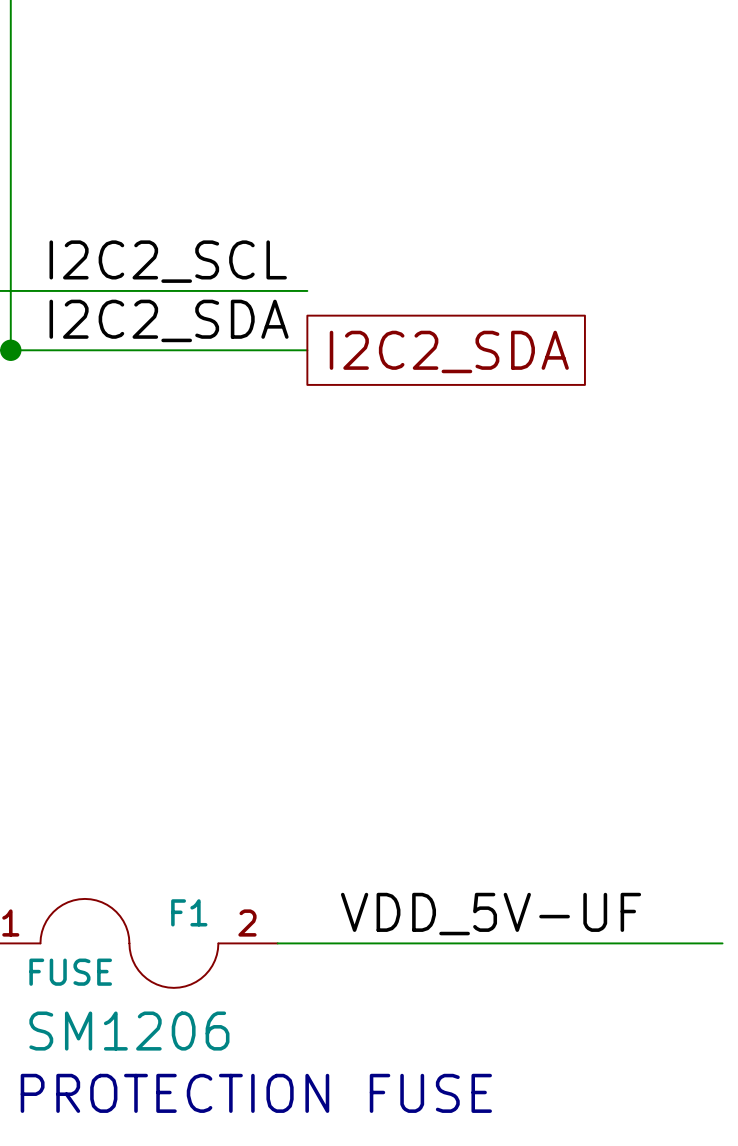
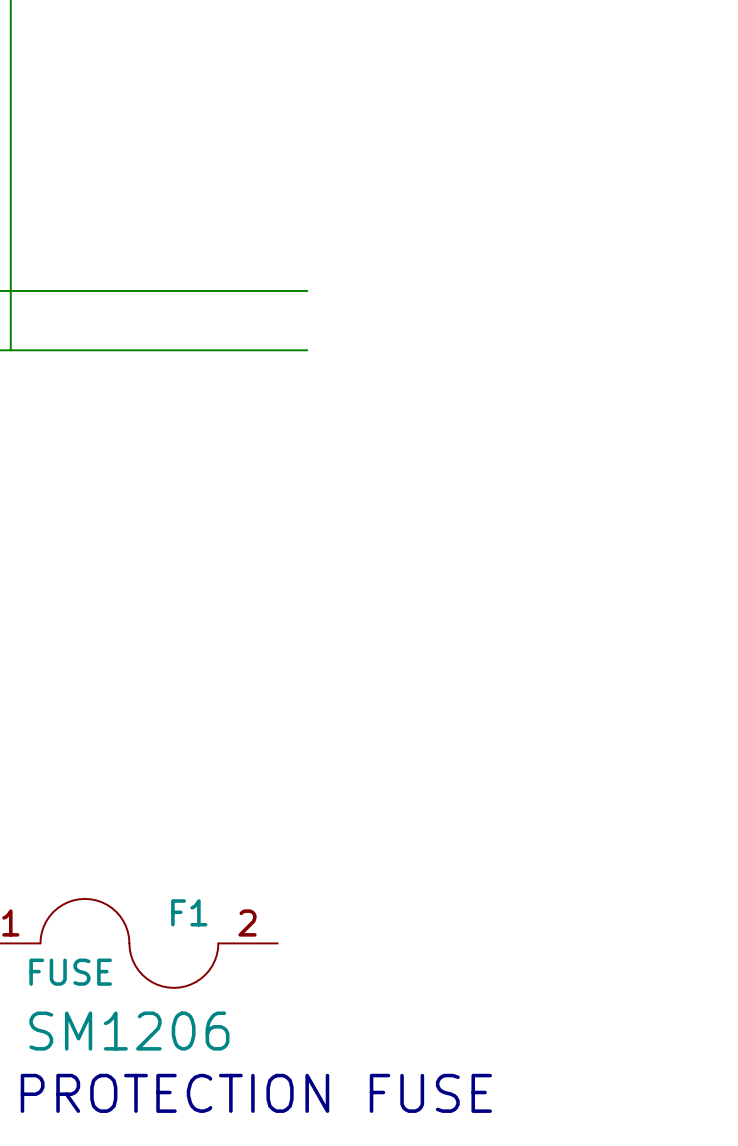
label: I2C2_SCL (168, 261) -> none
label: I2C2_SDA (169, 320) -> none
junction: (10, 350) -> none
global label: I2C2_SDA (449, 351) -> none
label: VDD_5V-UF (491, 914) -> none
wire: (277, 943) (722, 943) -> none

